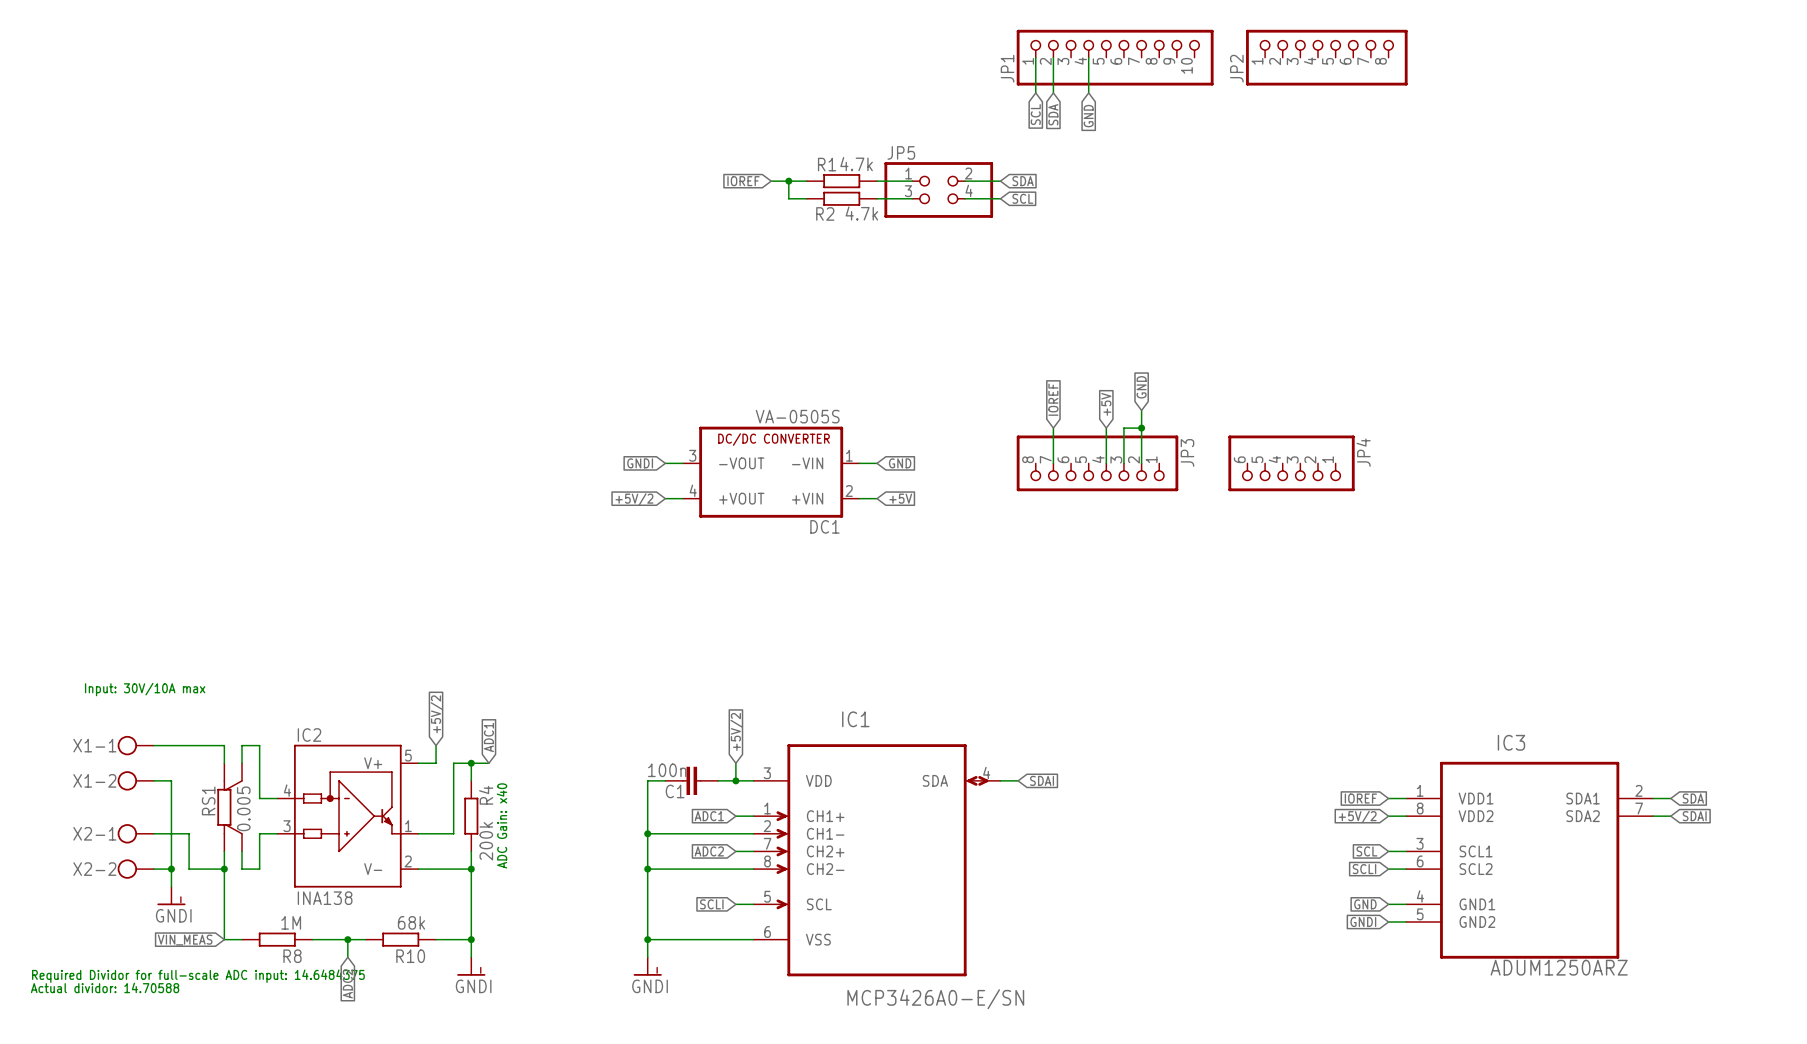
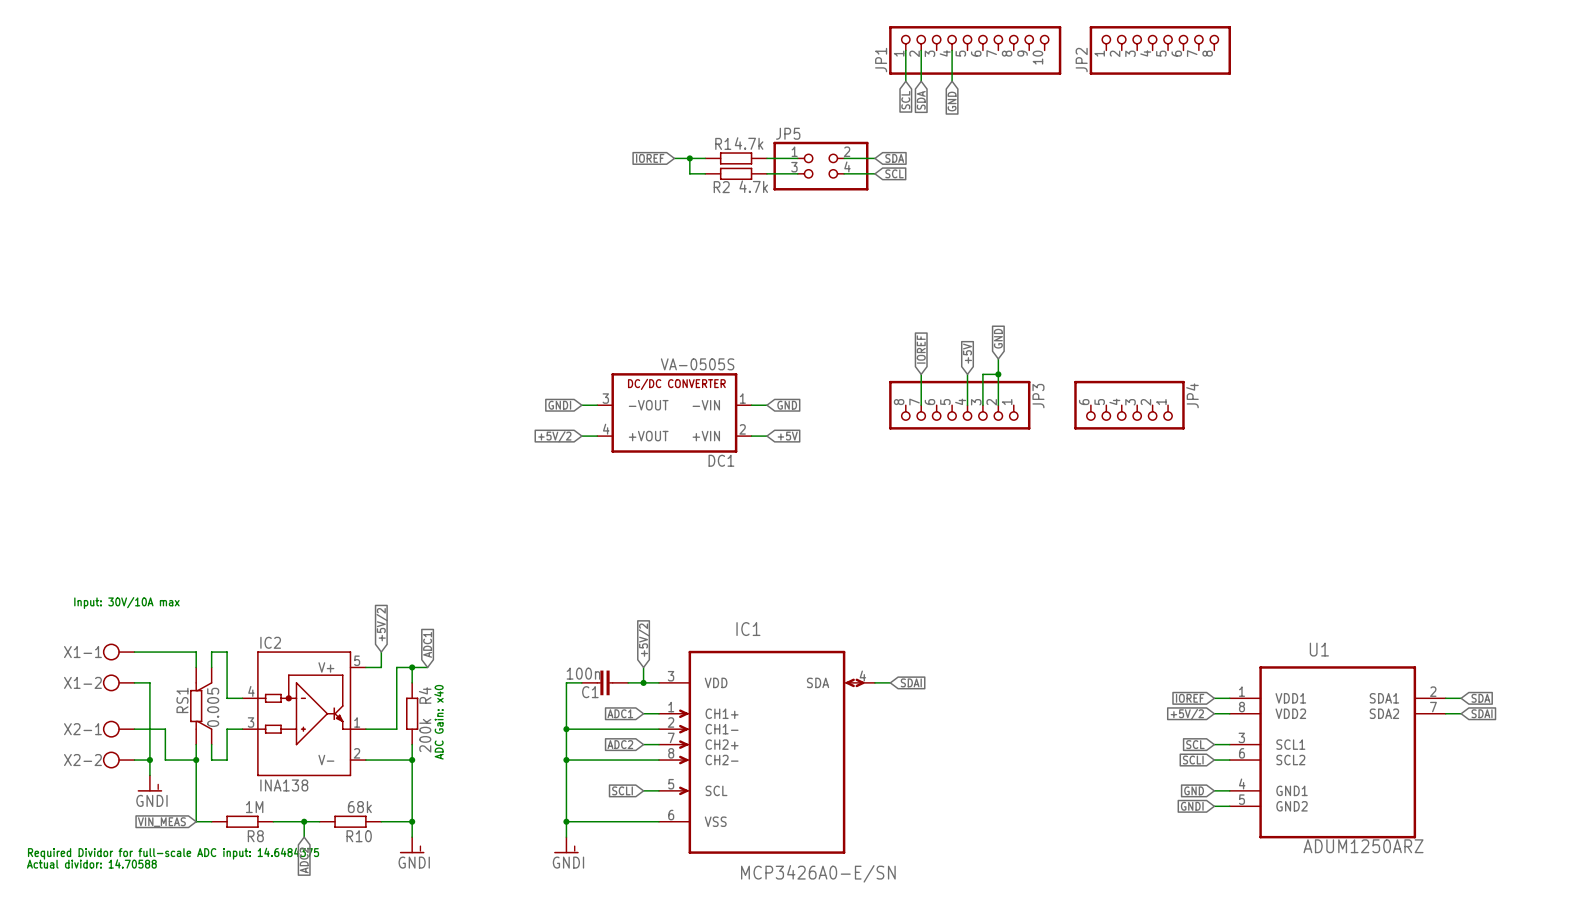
IC3 name: IC3 (1511, 742) -> U1 (1319, 649)

